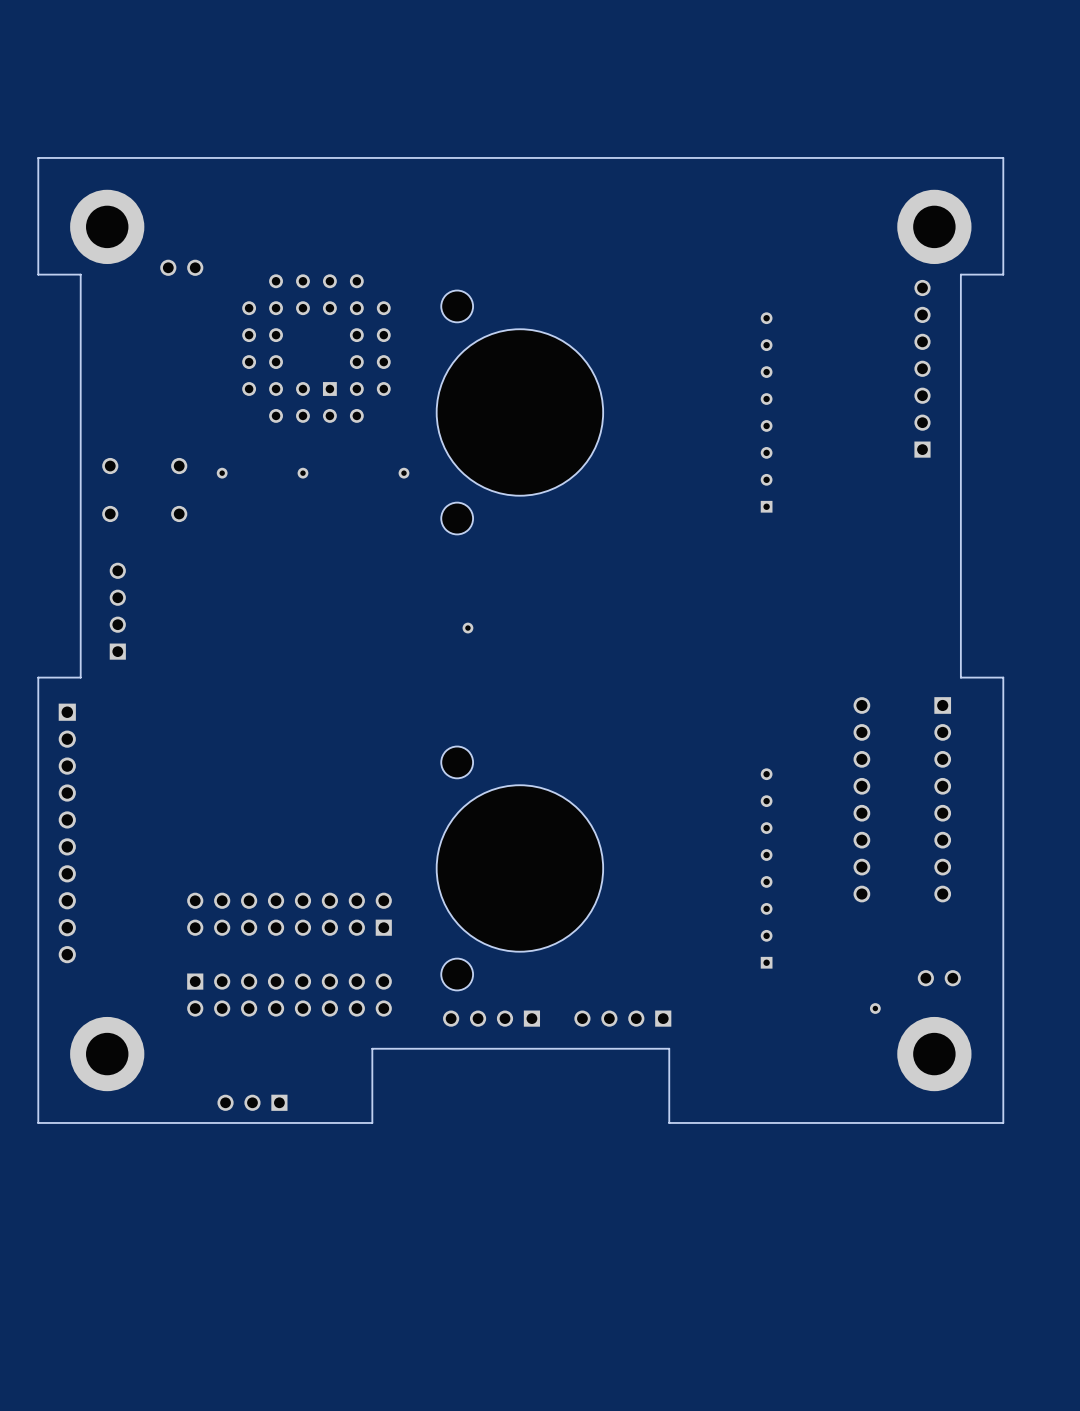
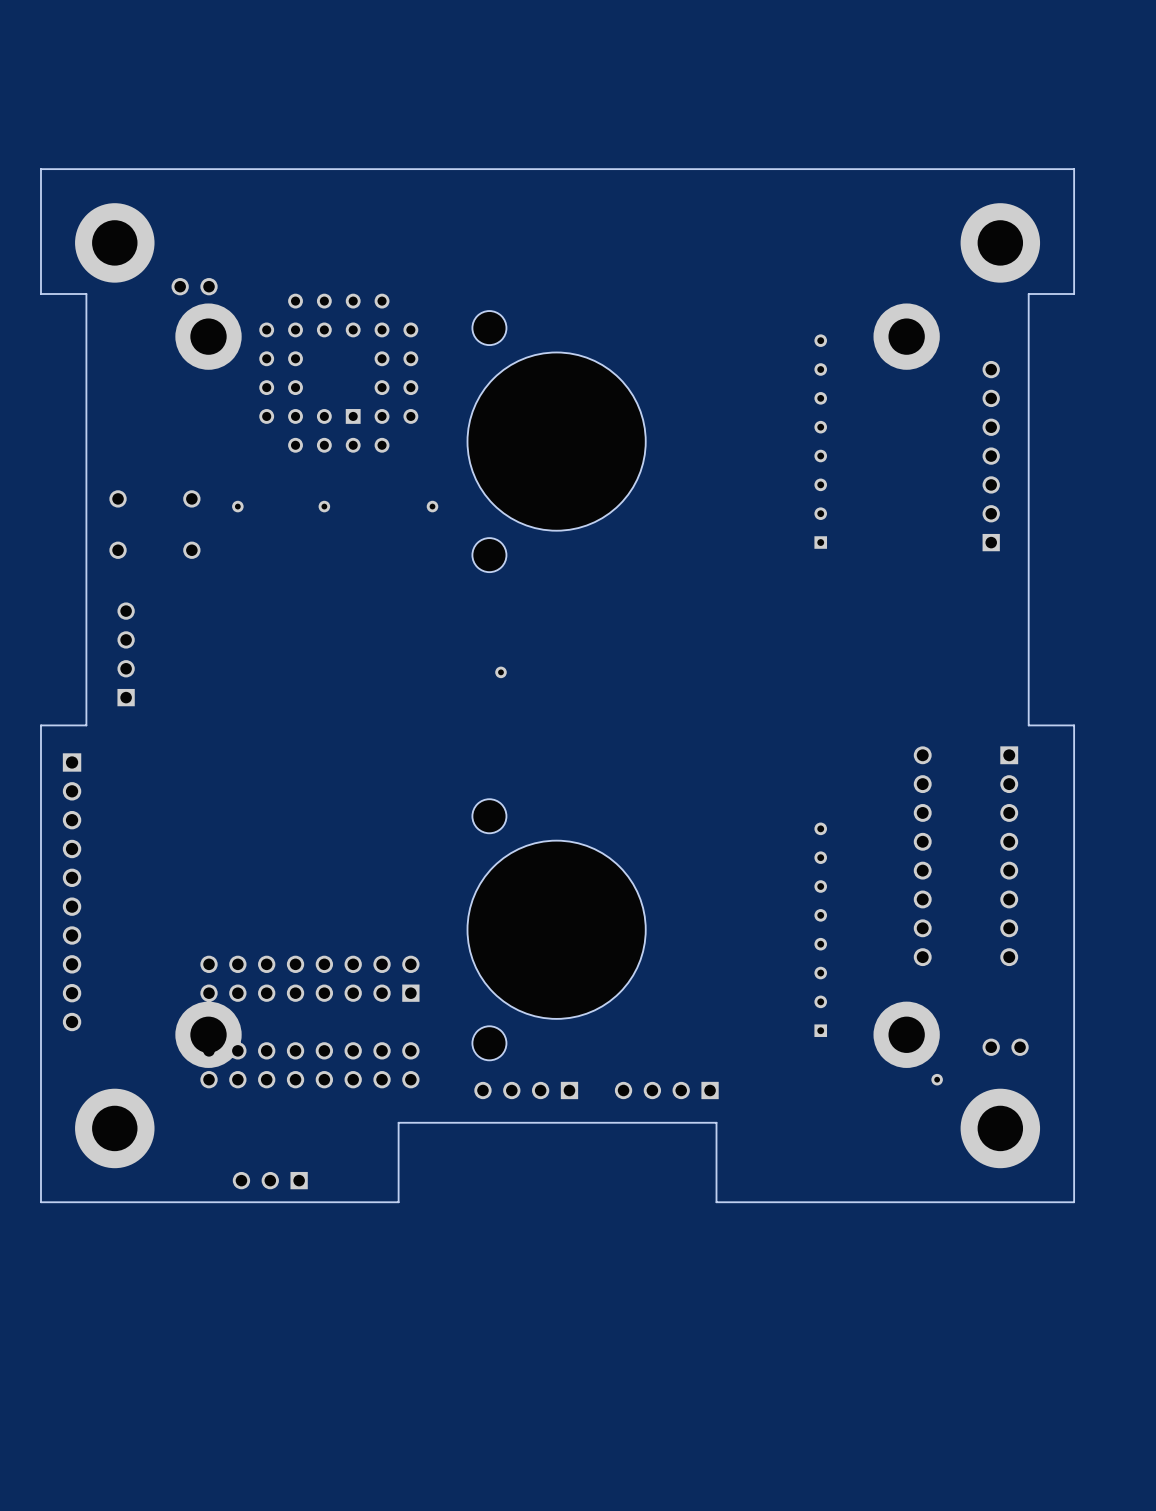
part: none -> (208, 336)
part: none -> (906, 336)
part position: (922, 368) -> (991, 456)
part: none -> (208, 1034)
part: none -> (906, 1034)

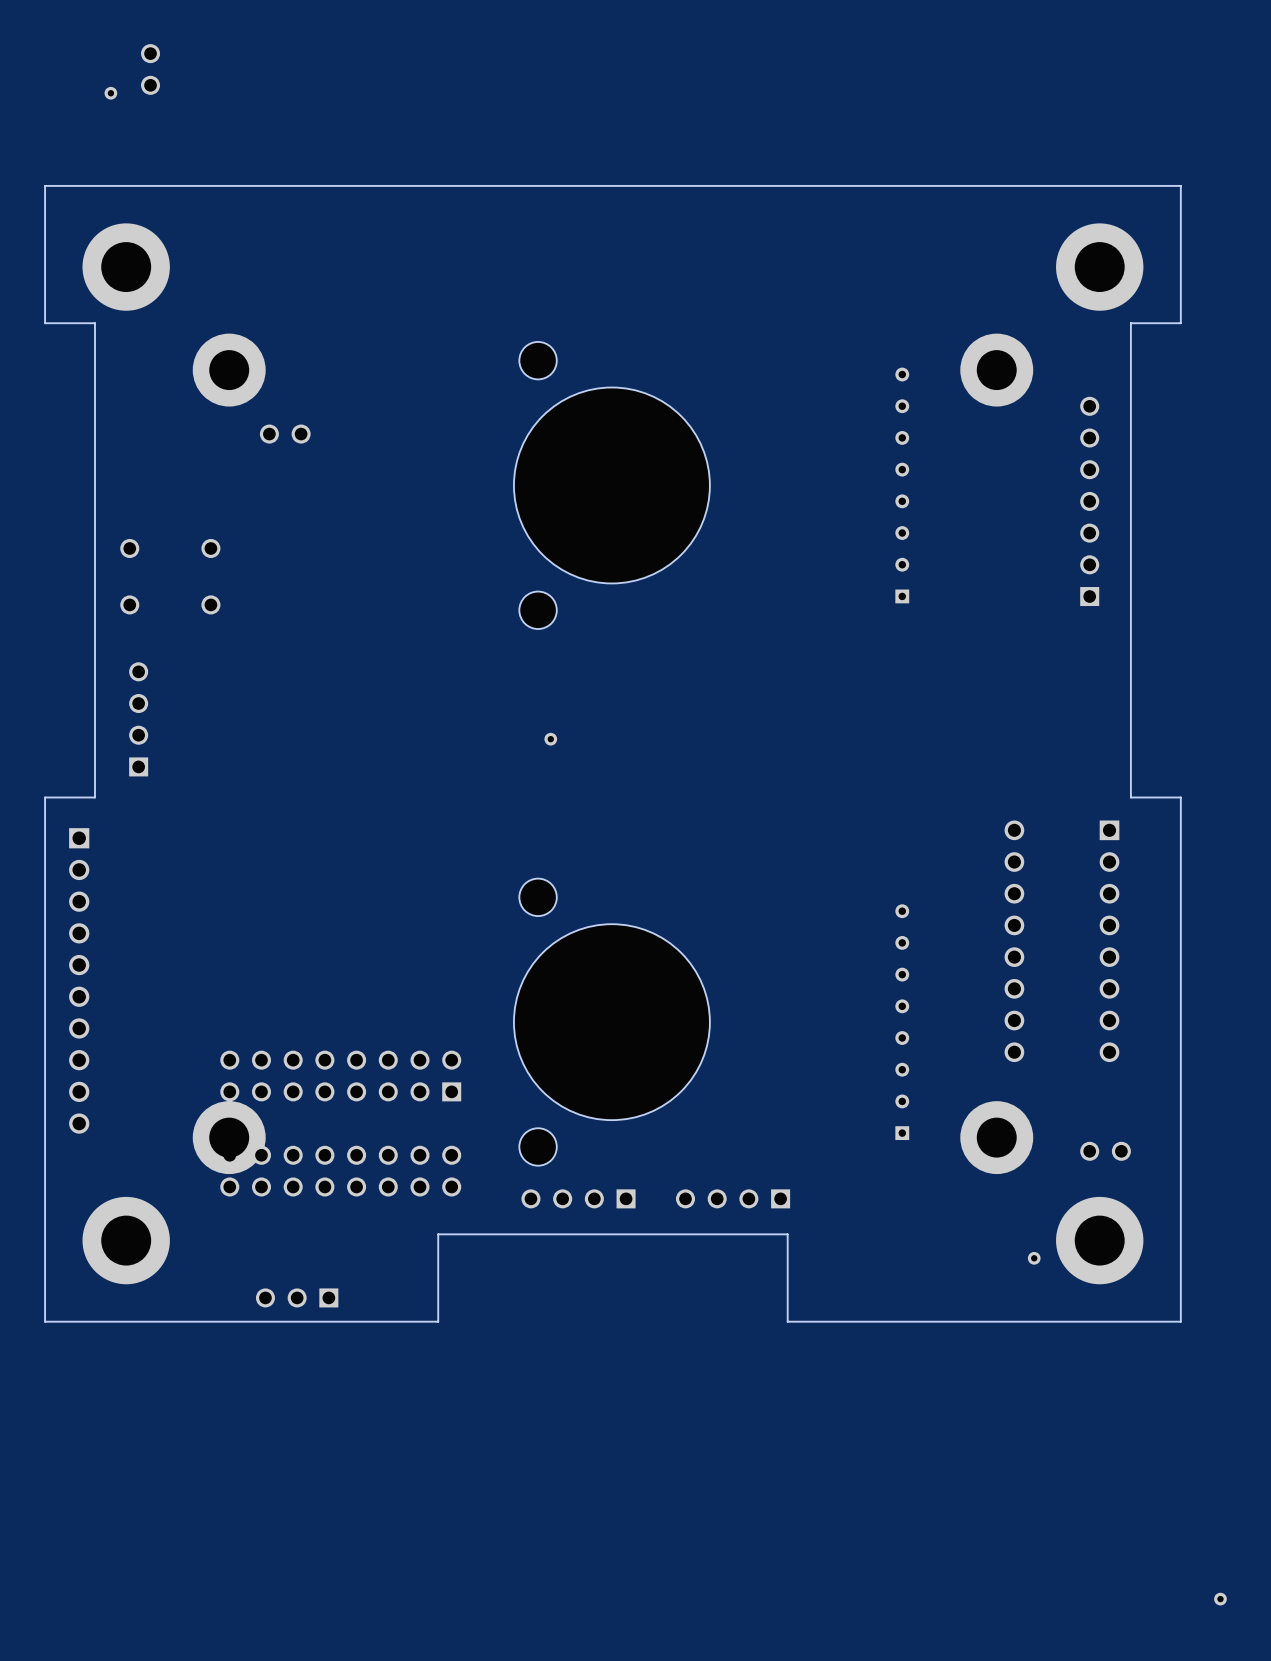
part: none -> (150, 69)
part: none -> (110, 93)
part: (194, 286) -> none
part: (338, 373) -> none
part: none -> (285, 434)
part: (237, 506) -> none
part: (324, 506) -> none
part: (432, 506) -> none
part position: (937, 1079) -> (1034, 1258)
part: none -> (1220, 1599)

